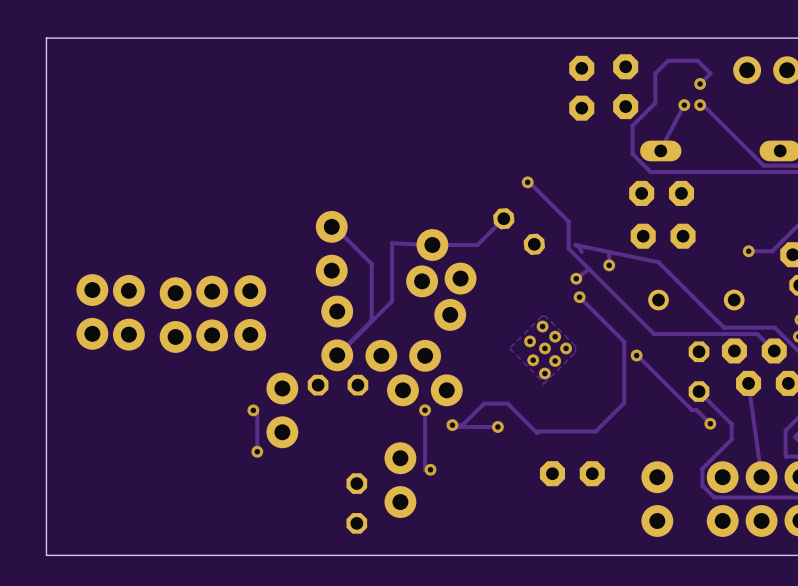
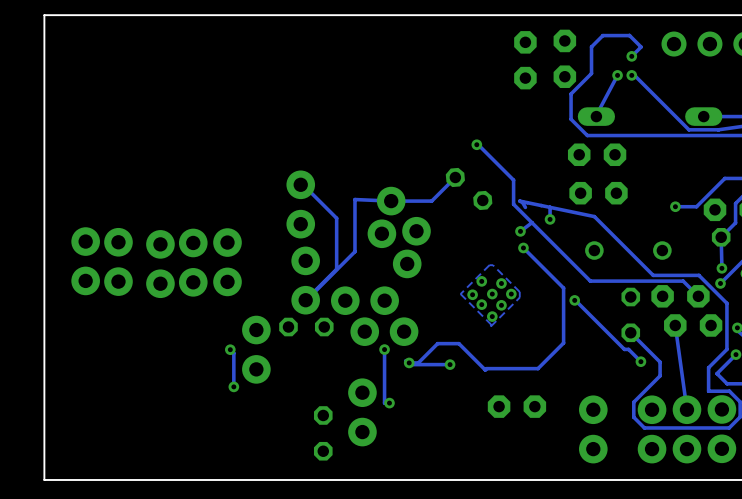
via: (542, 326) -> none
via: none -> (481, 281)
via: (530, 341) -> none
via: none -> (472, 294)

